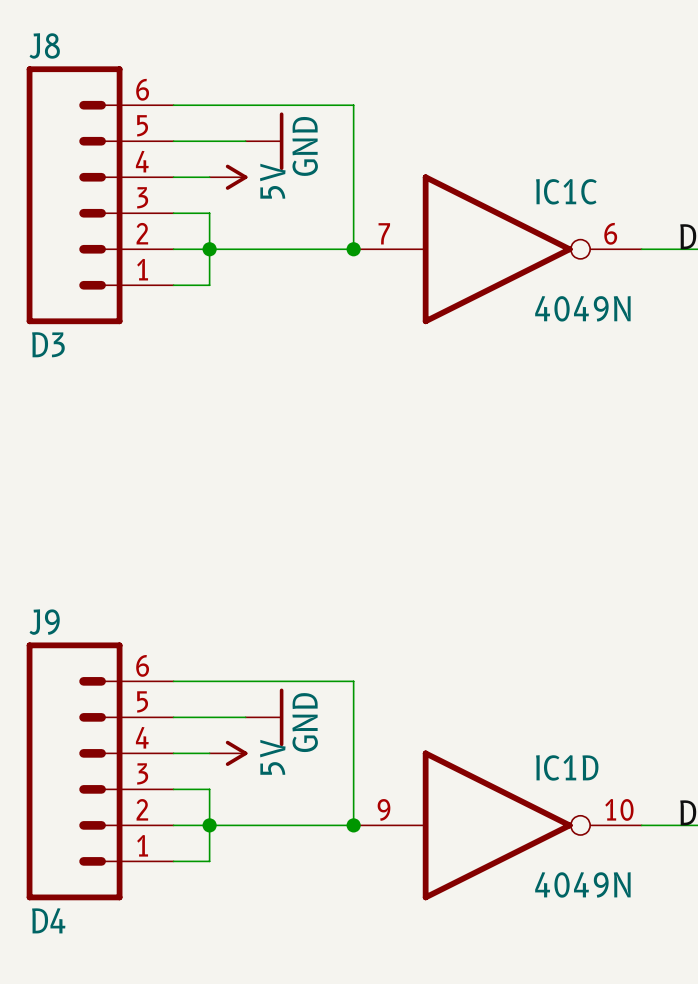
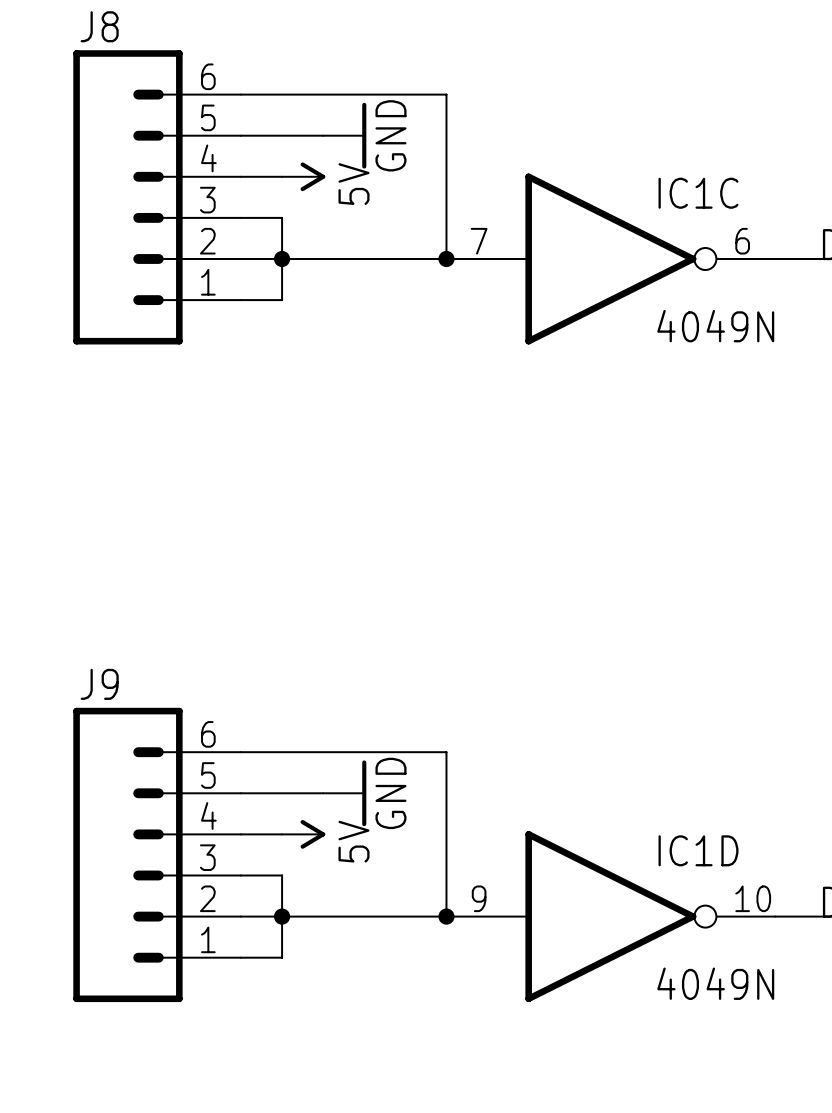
J8 value: D3 (48, 344) -> none
J9 value: D4 (48, 920) -> none

